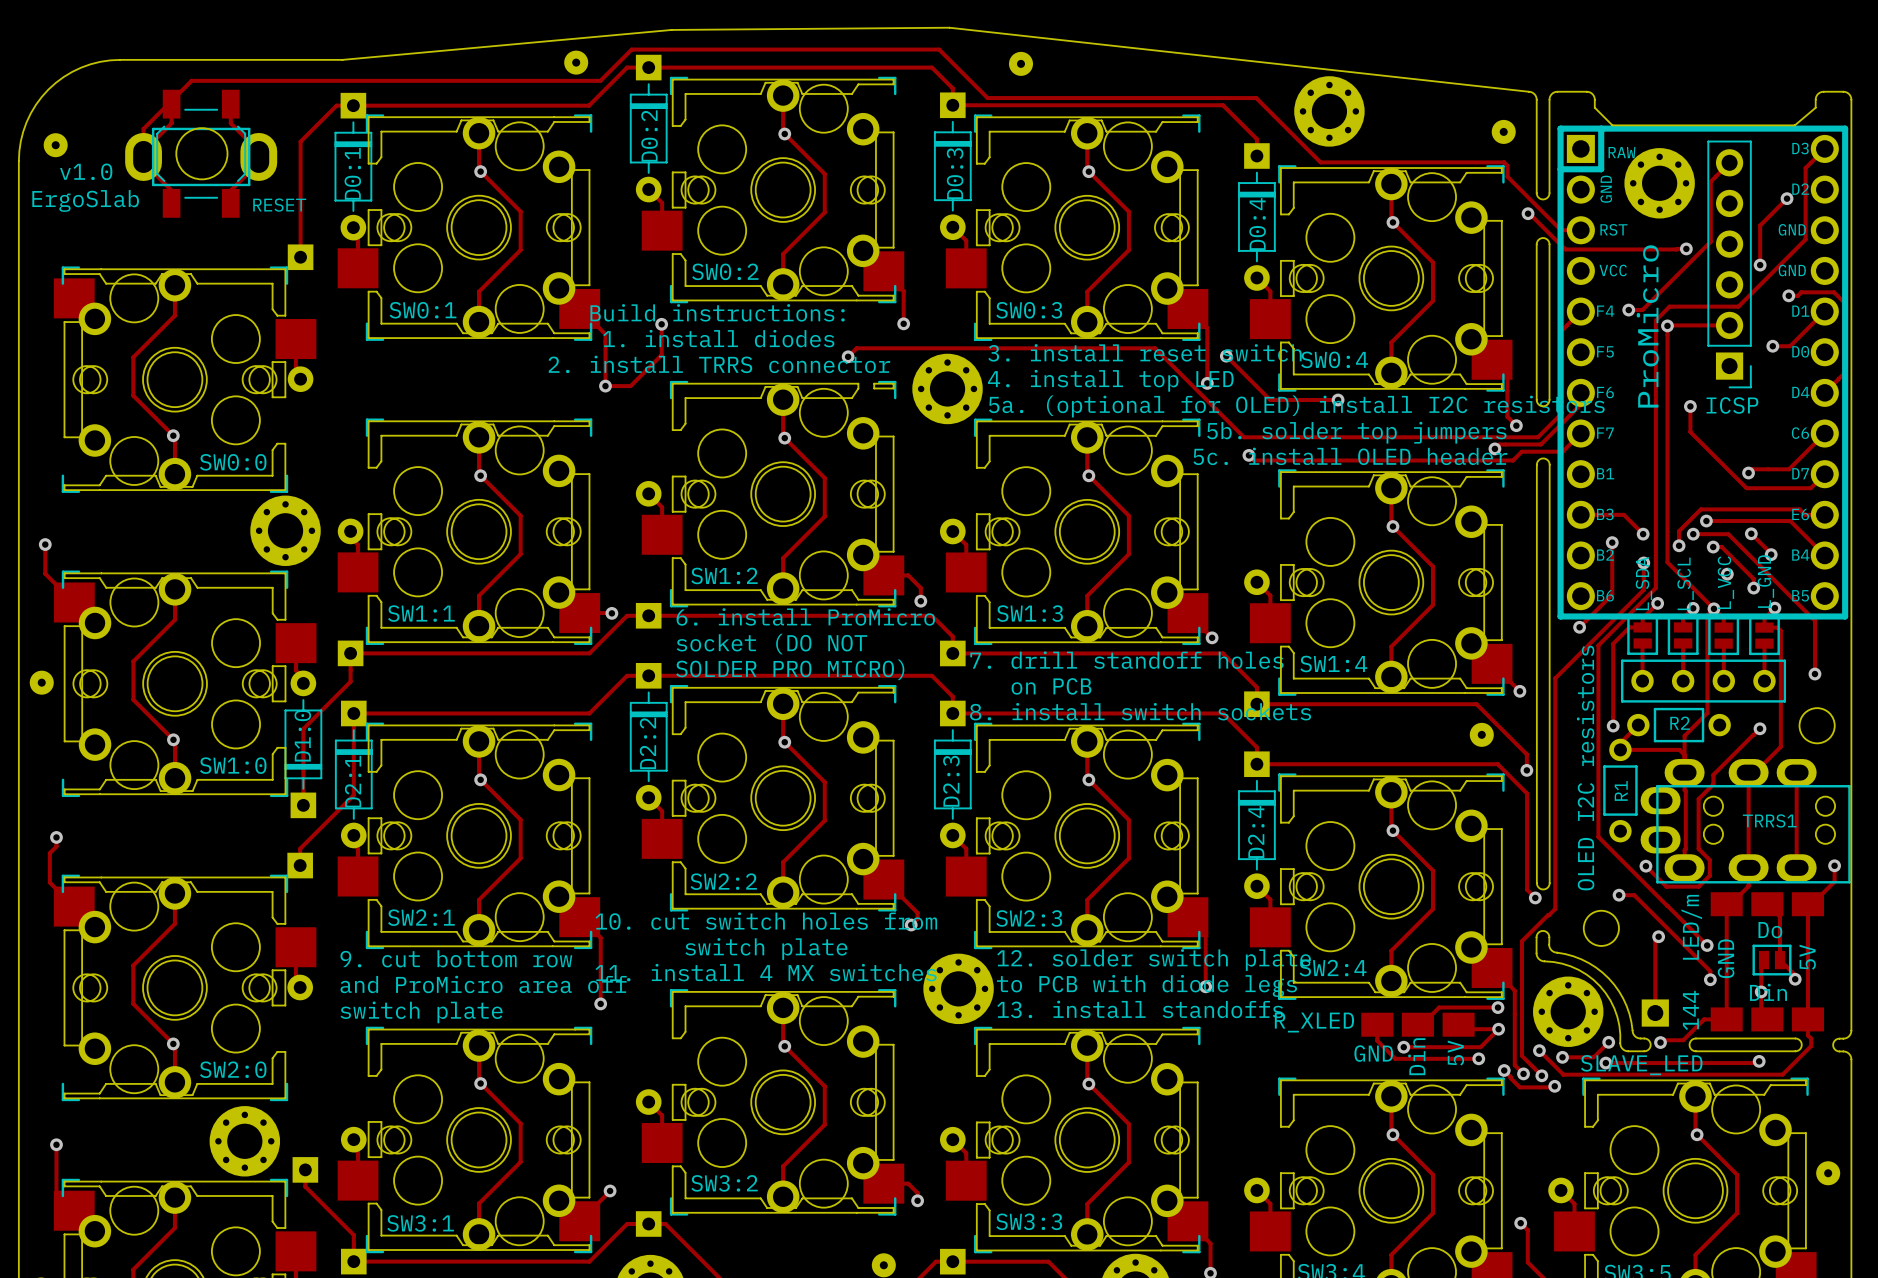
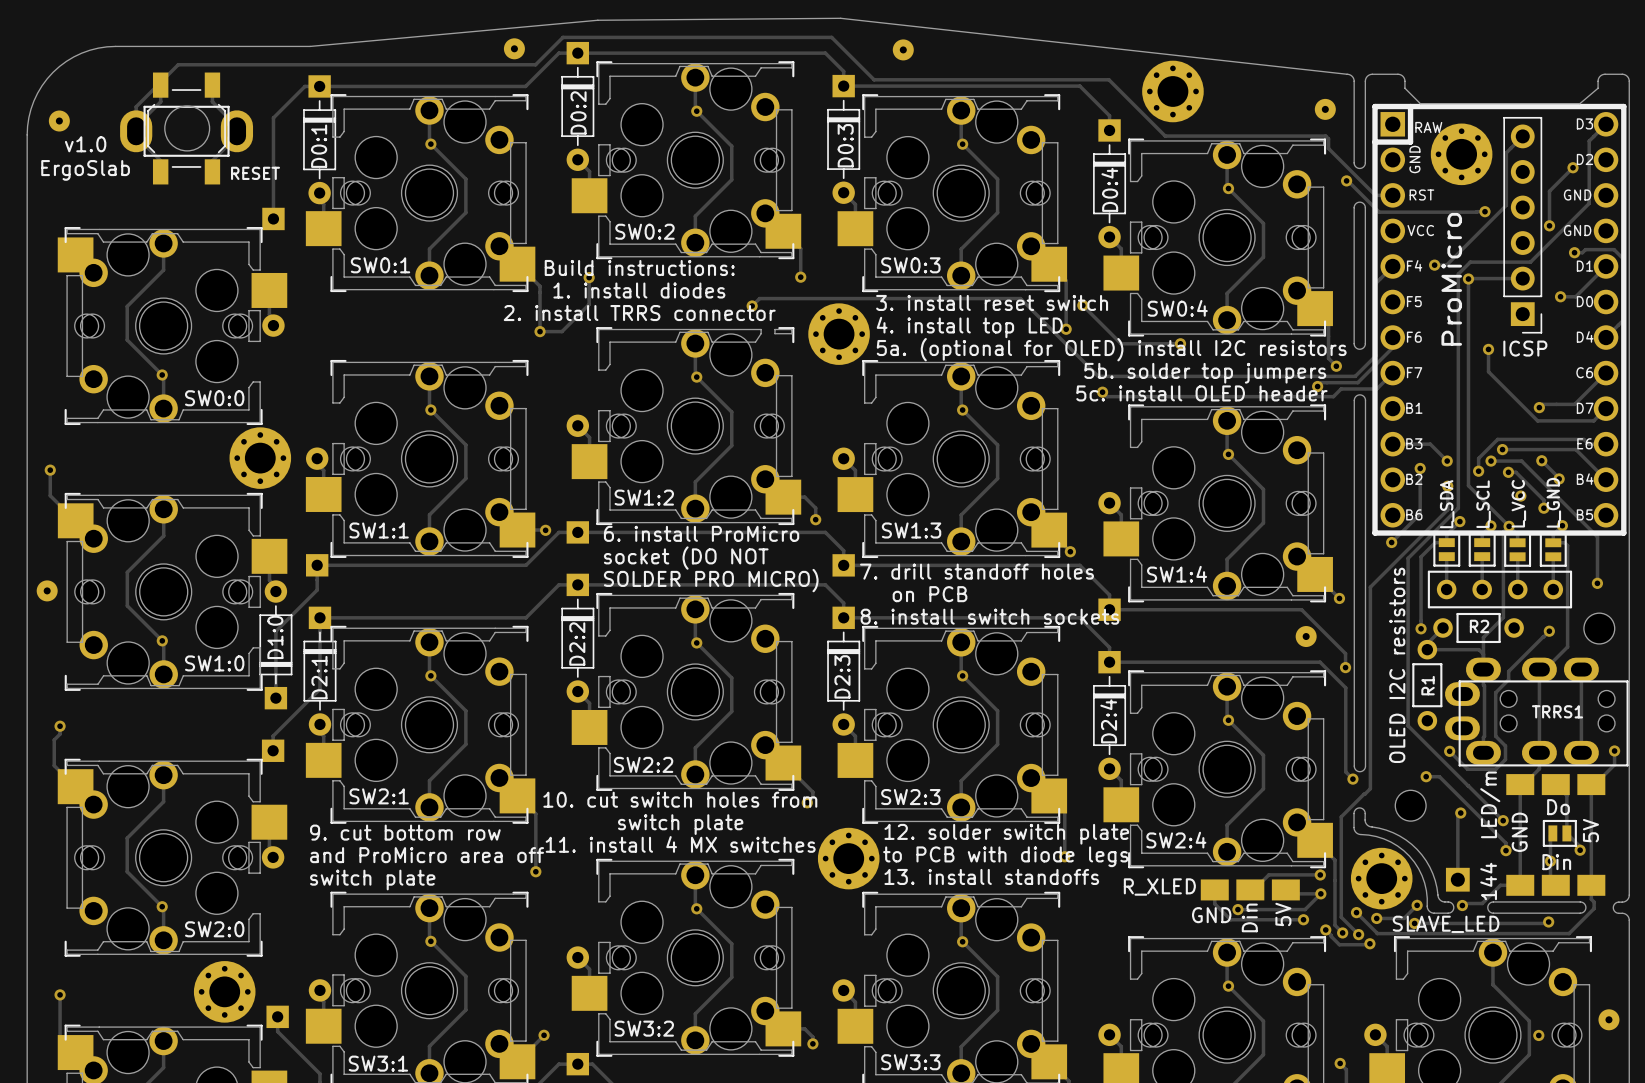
via position: (1697, 1134) -> (1538, 1035)

